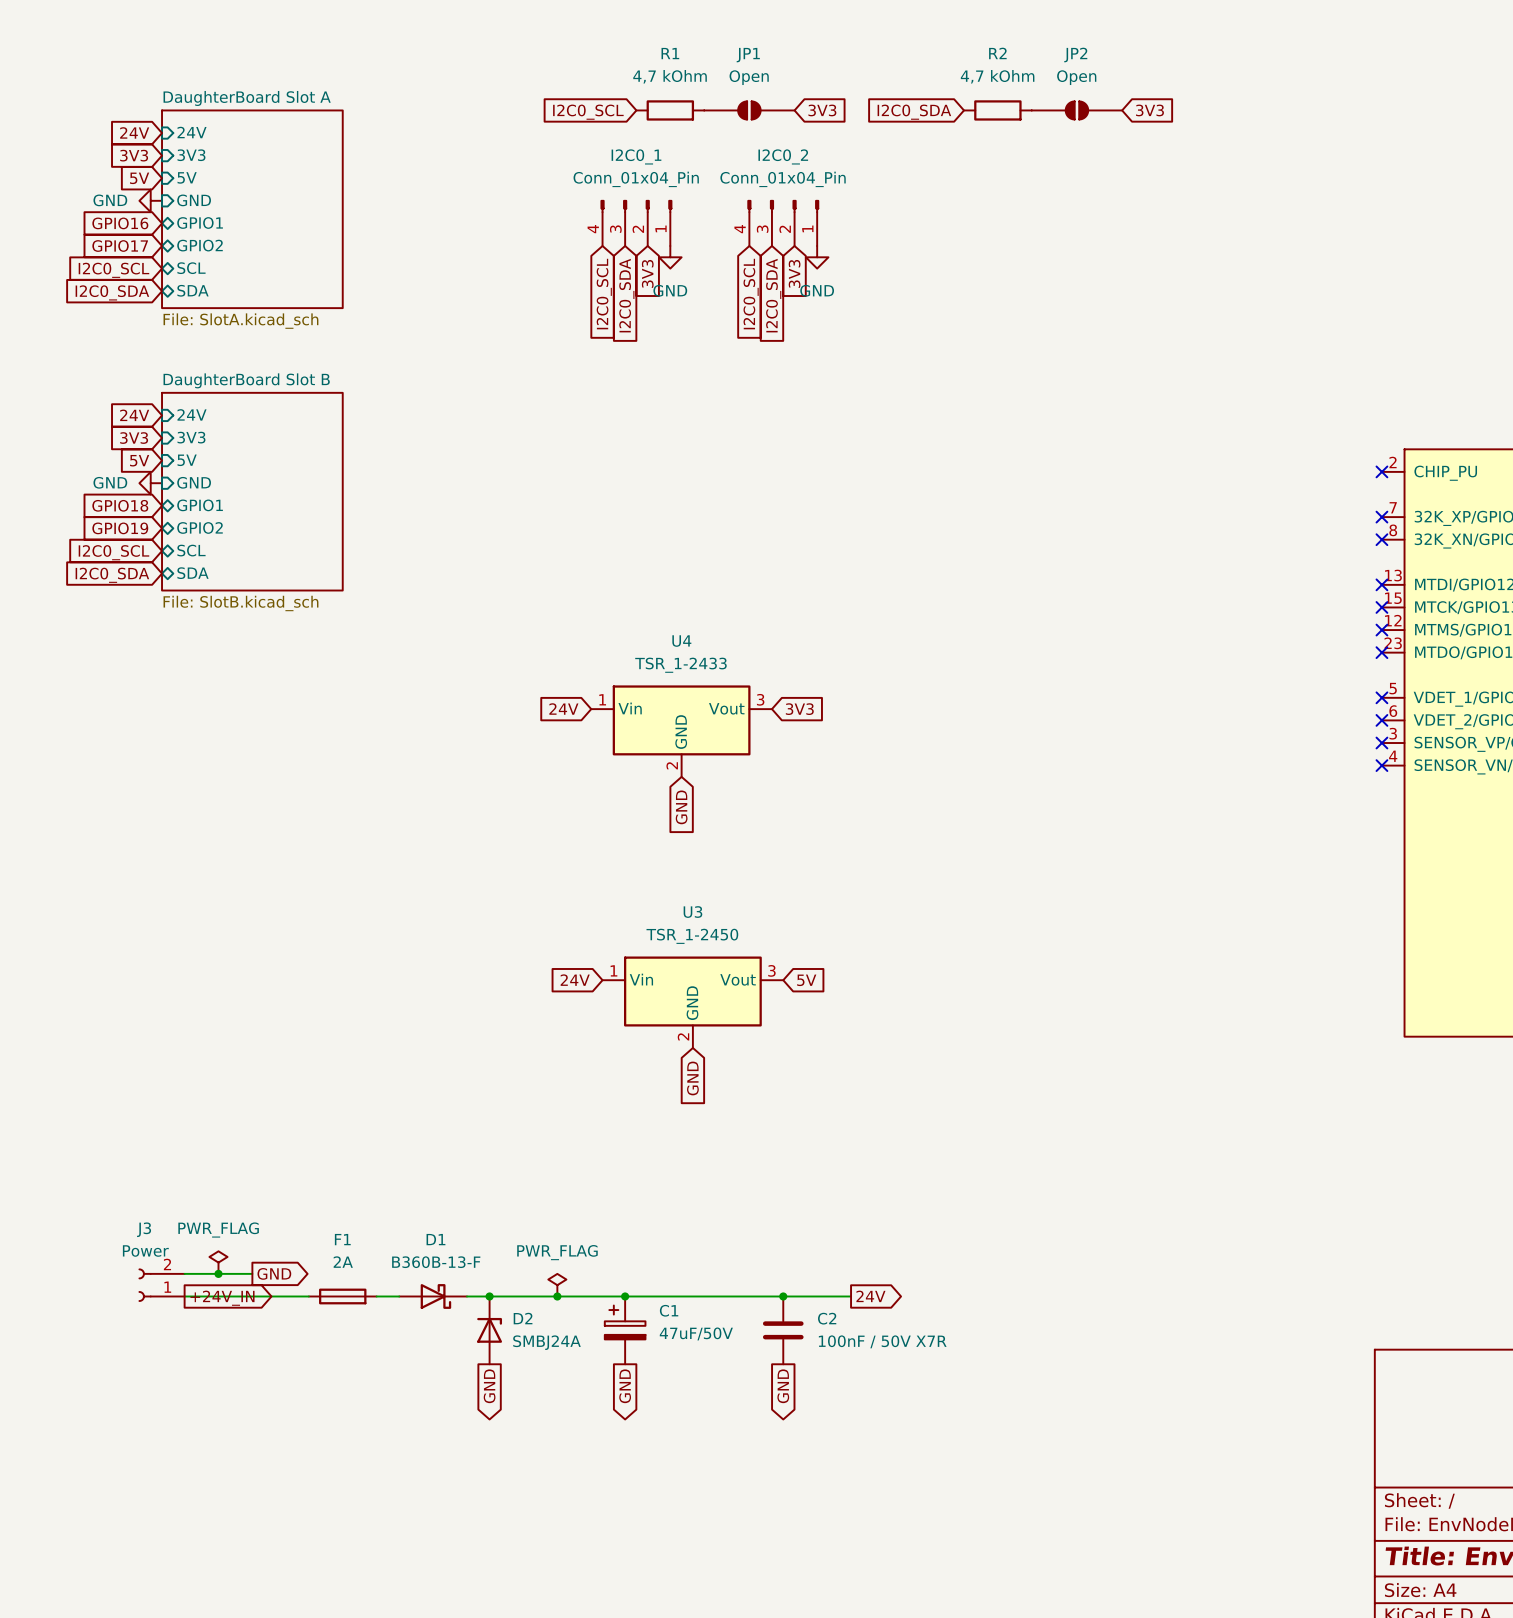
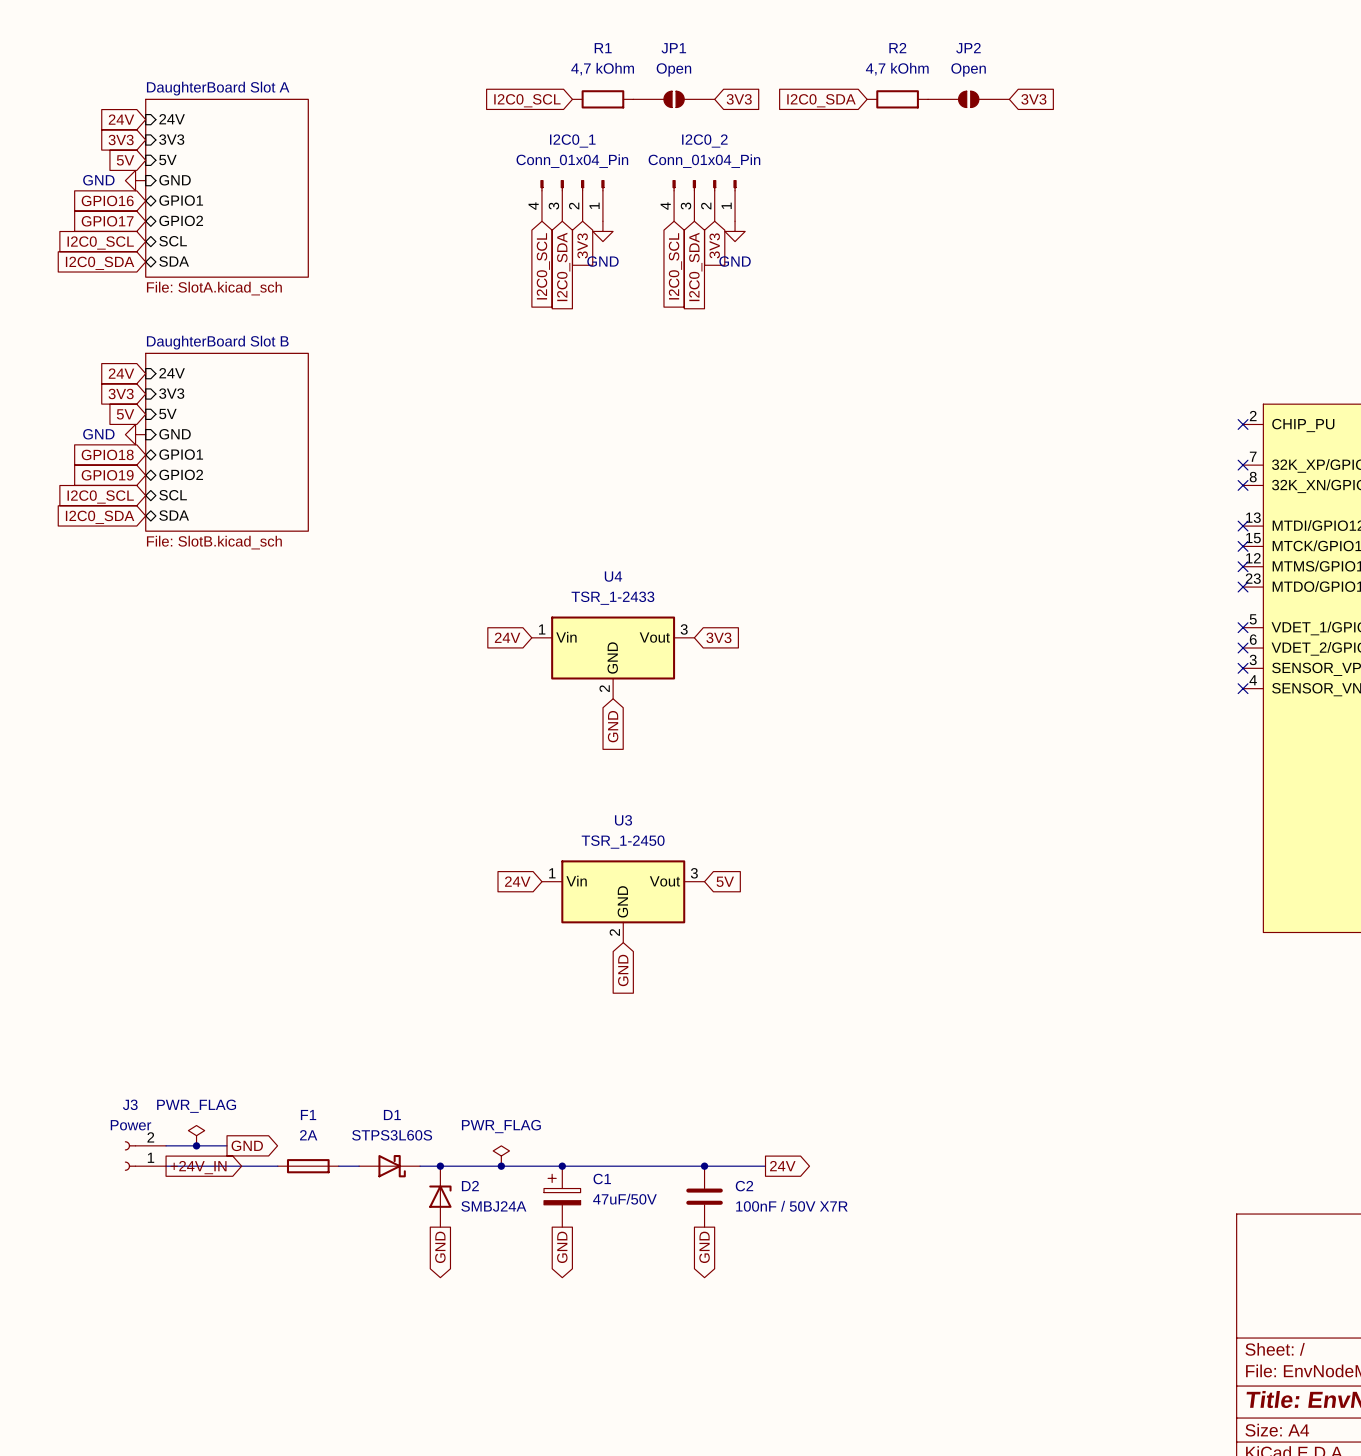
D1 value: B360B-13-F (436, 1262) -> STPS3L60S (392, 1135)

